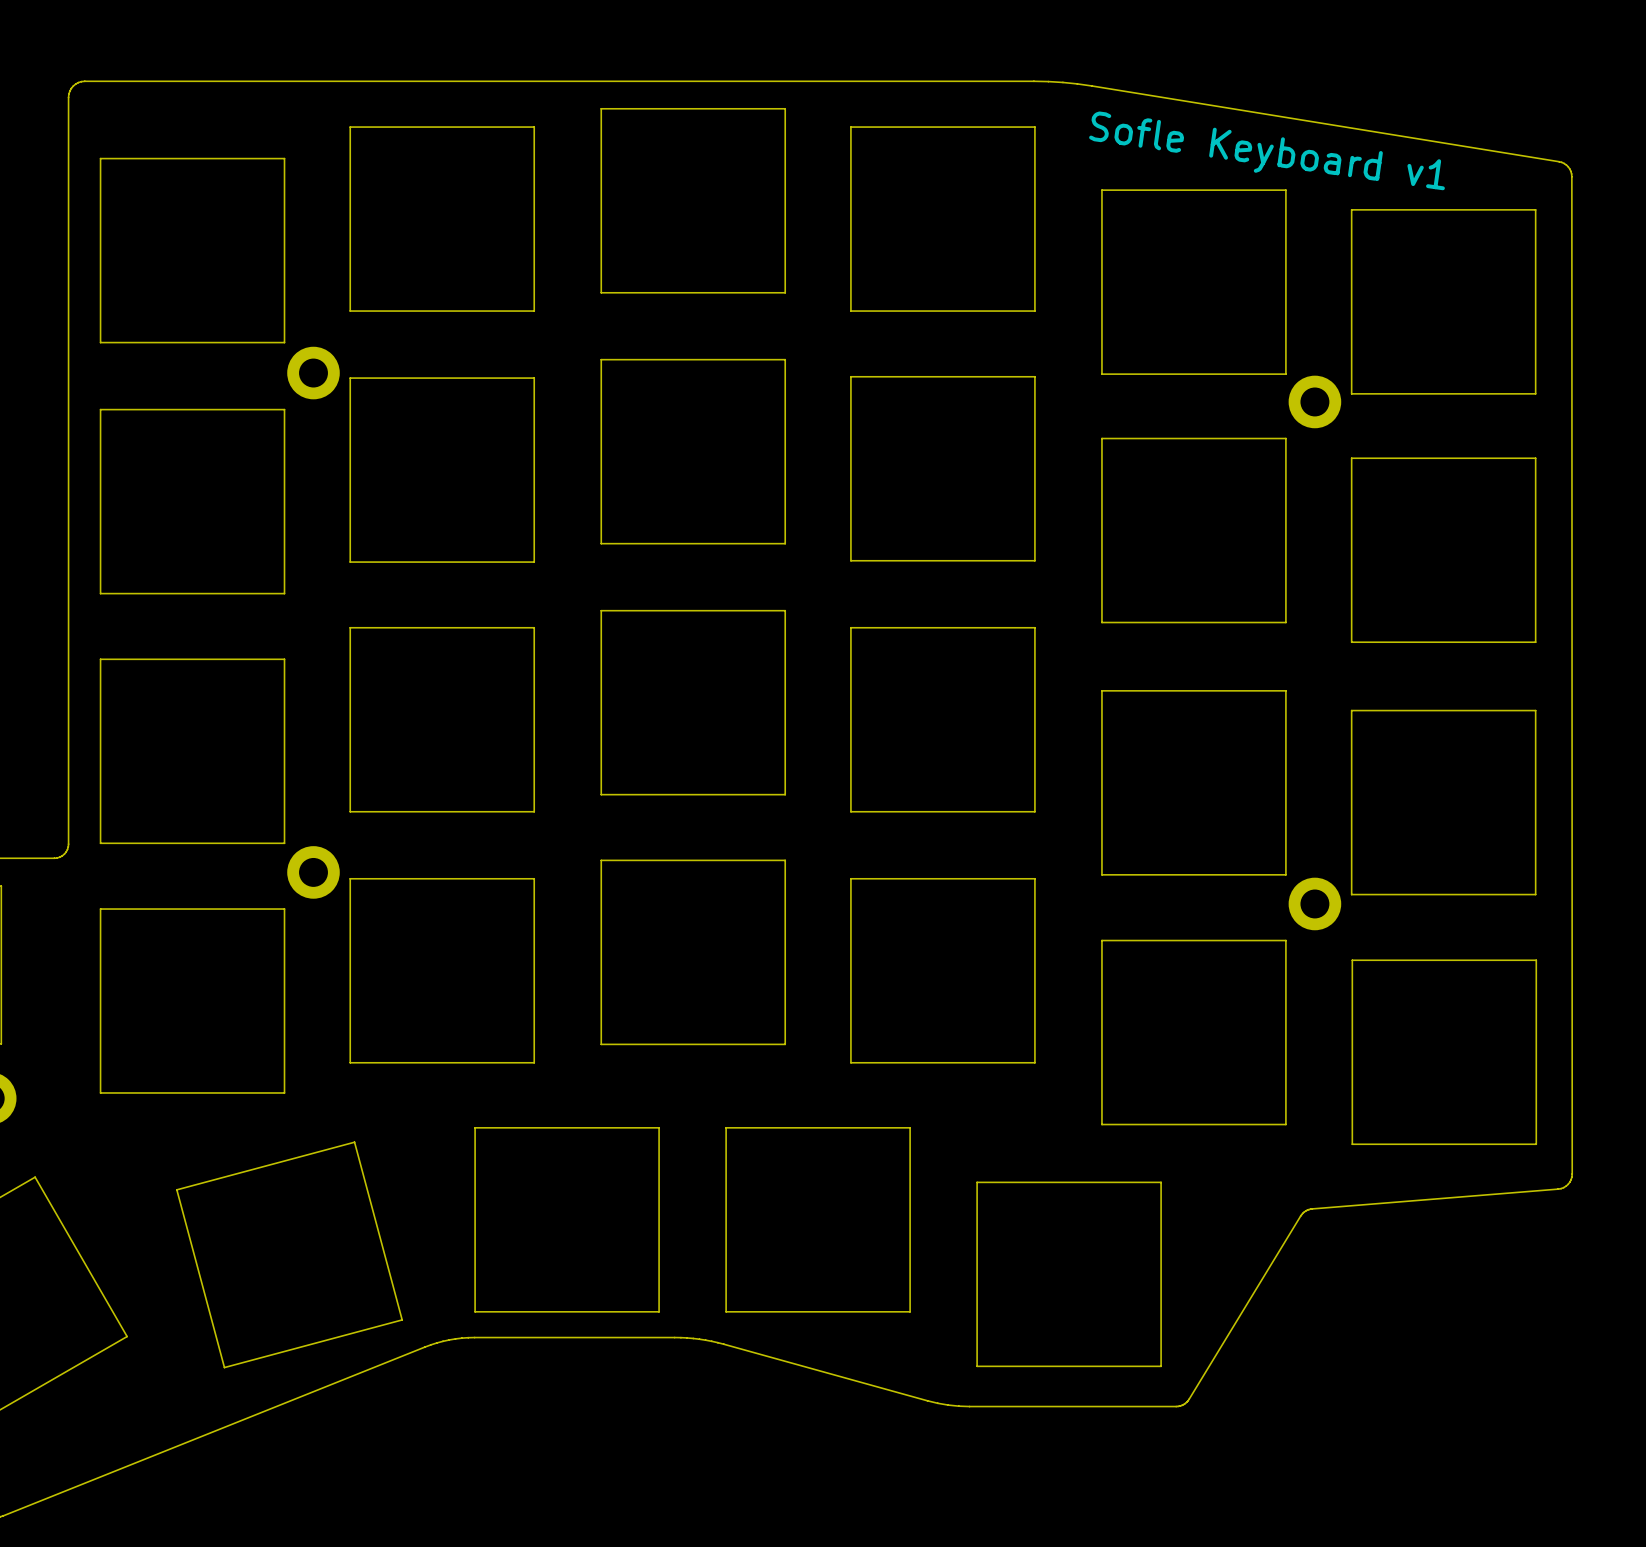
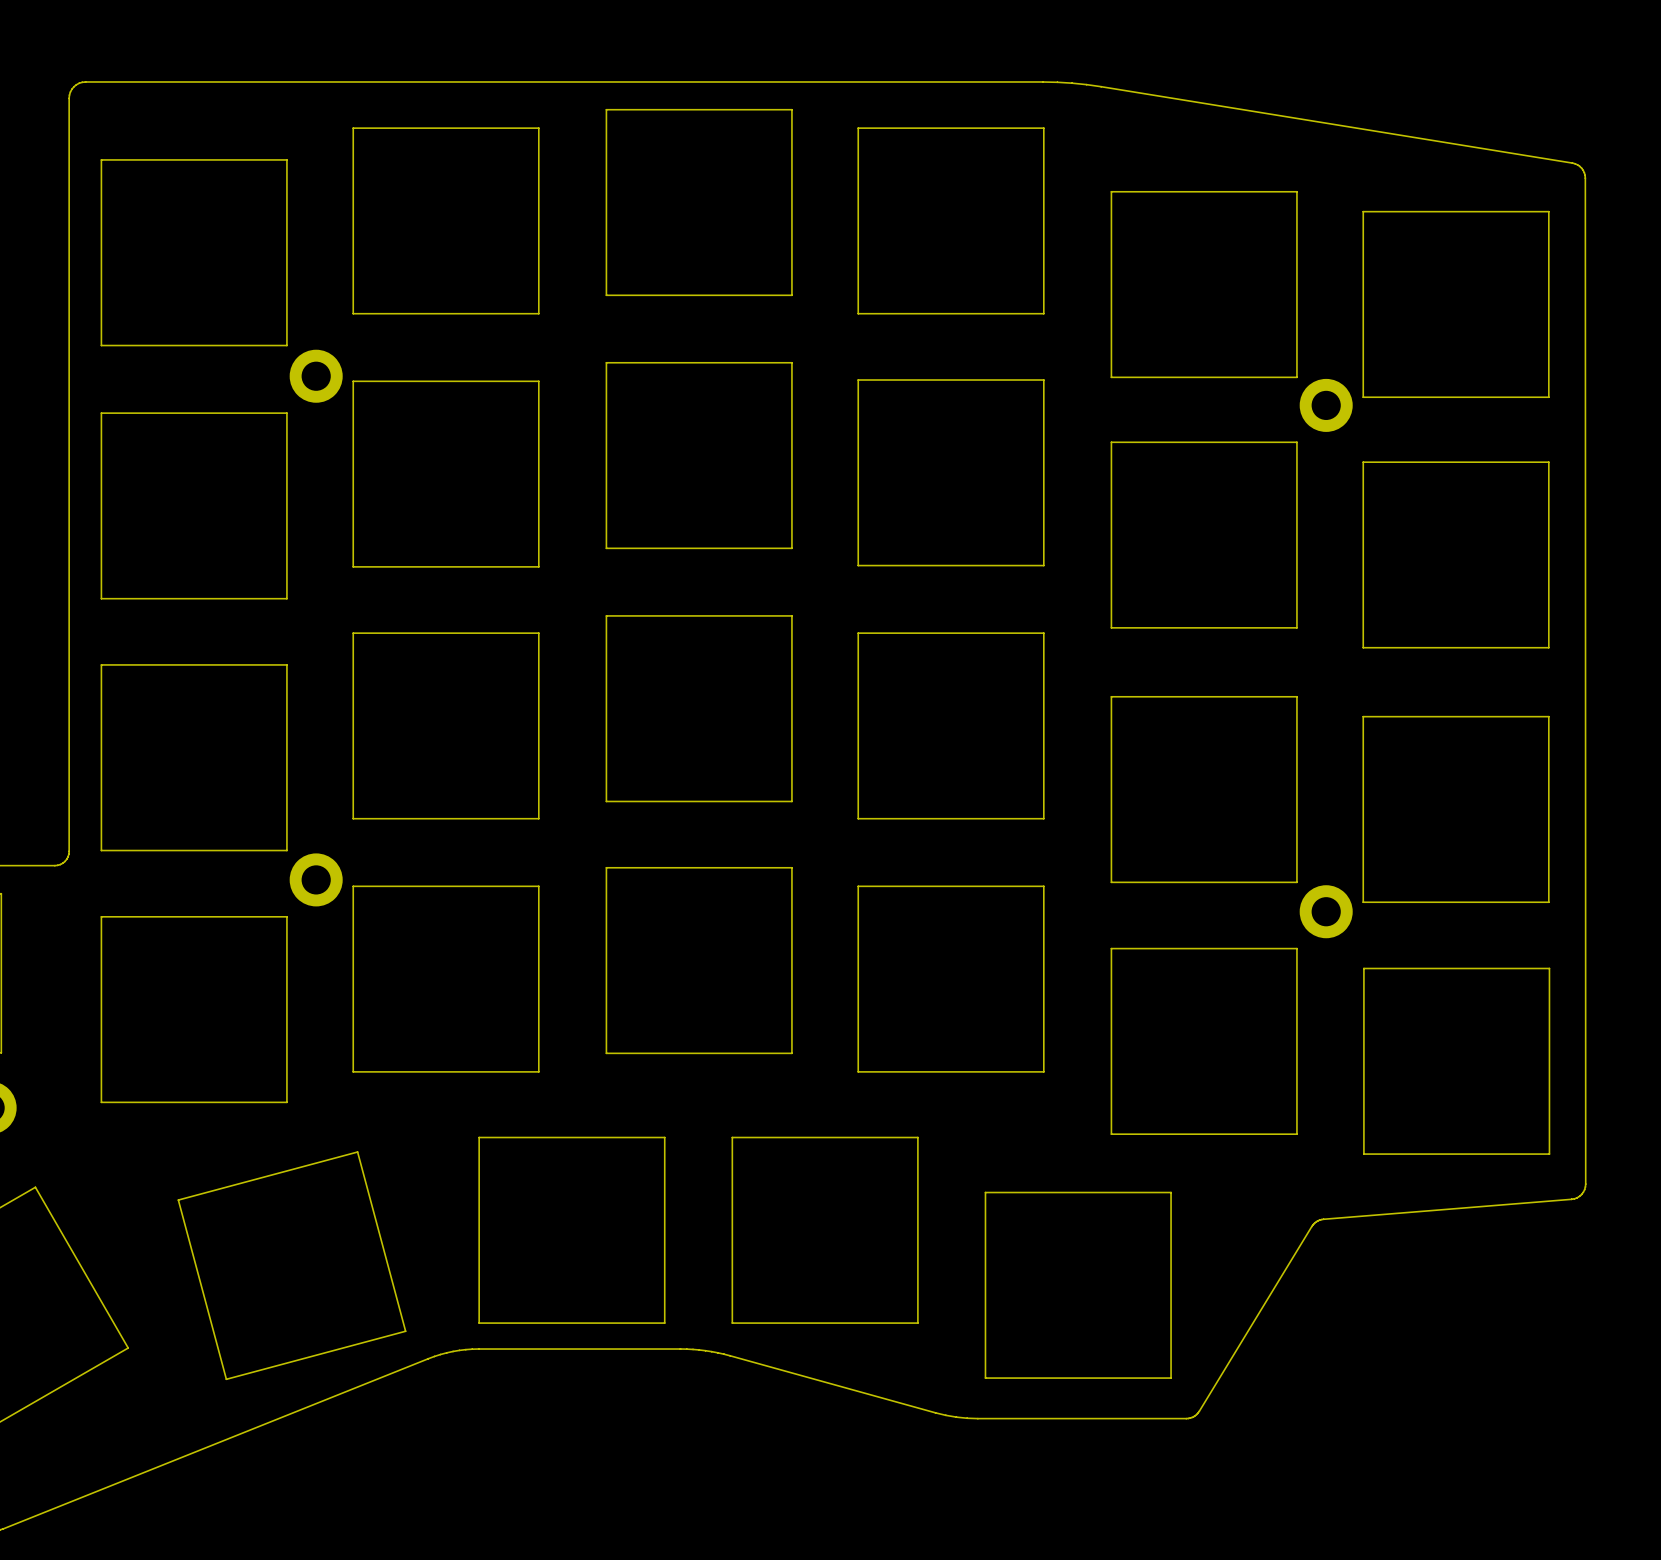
text: Sofle Keyboard v1 (1267, 150) -> none

